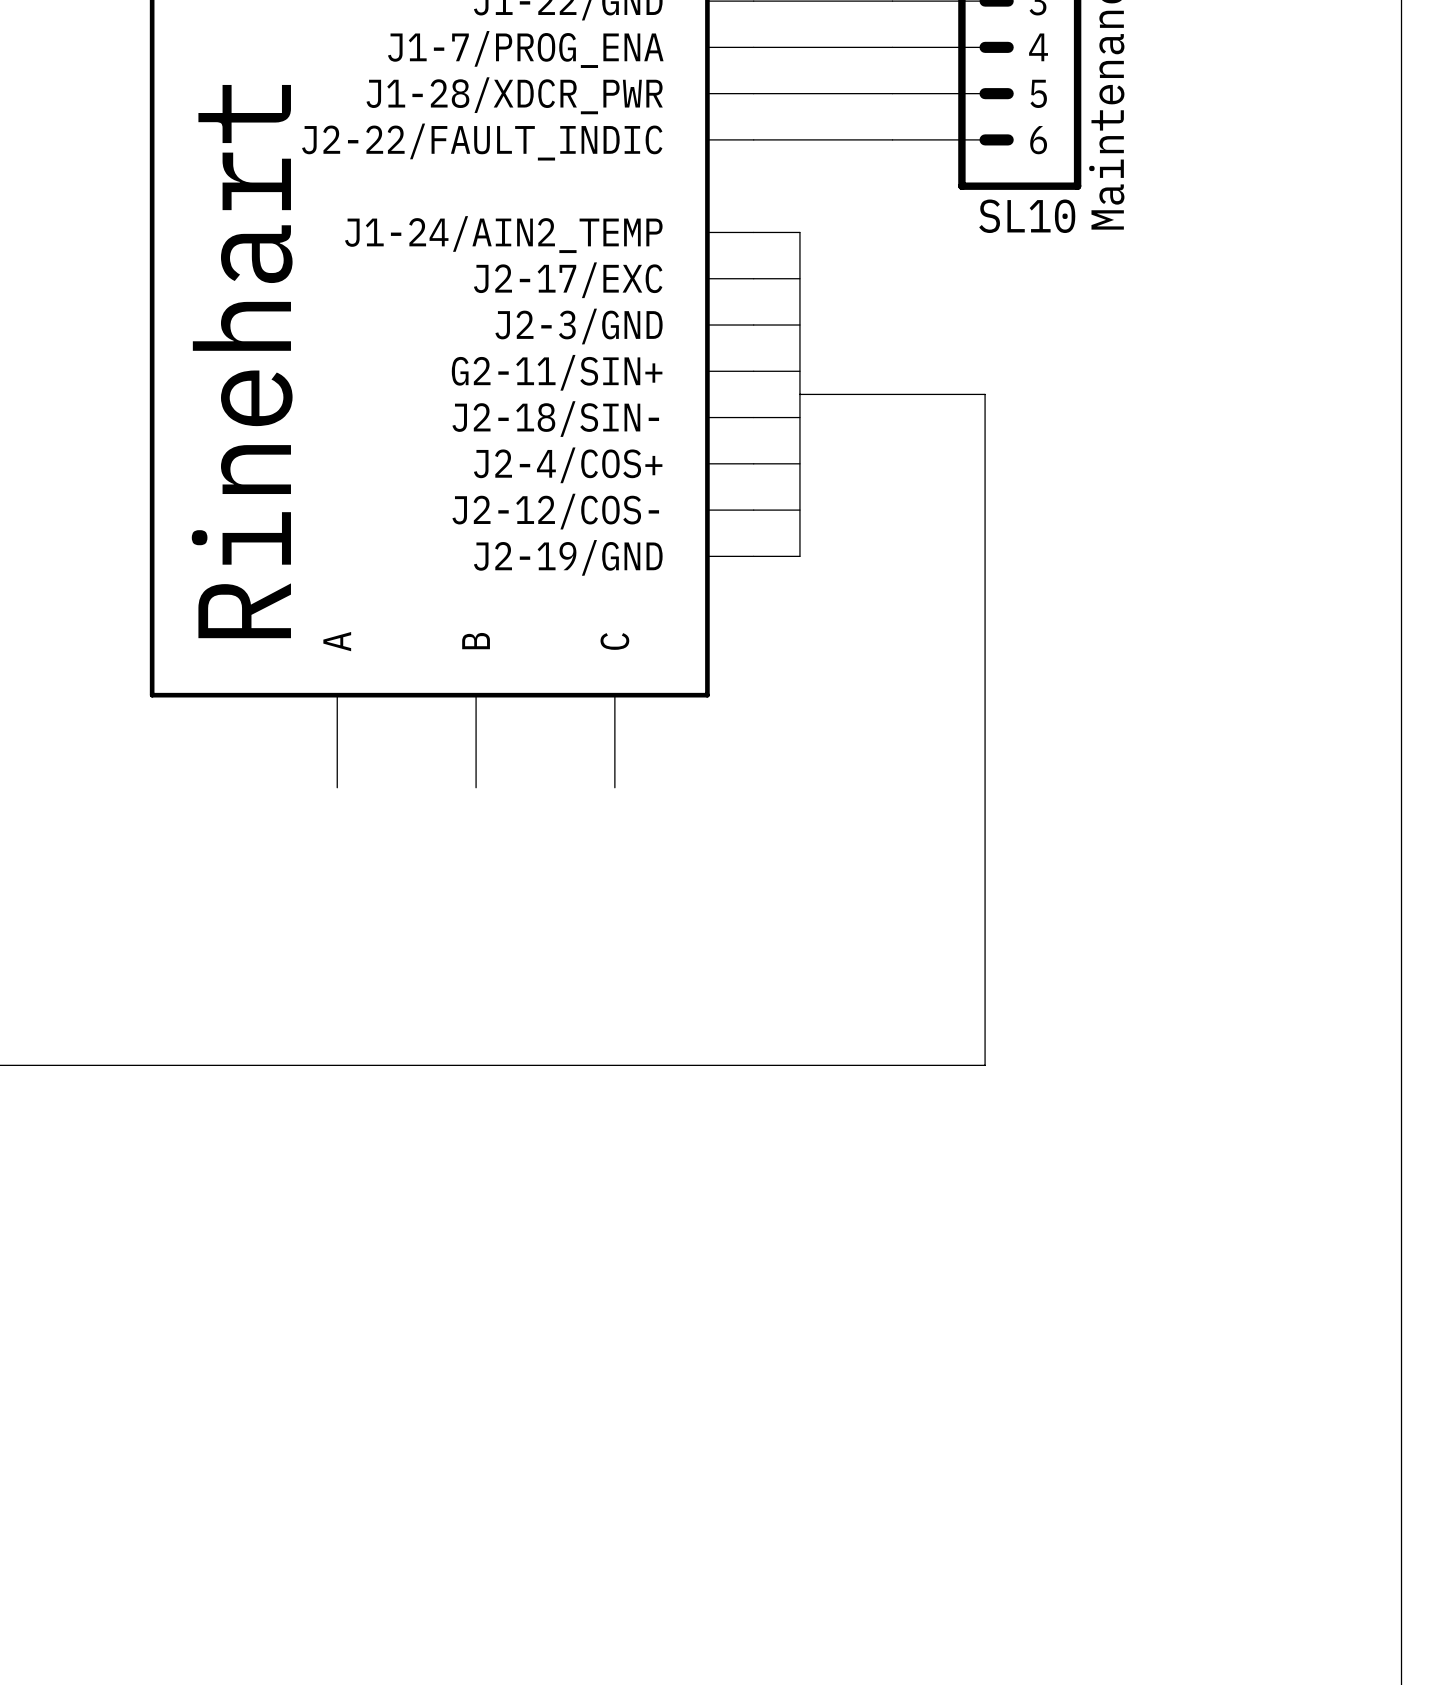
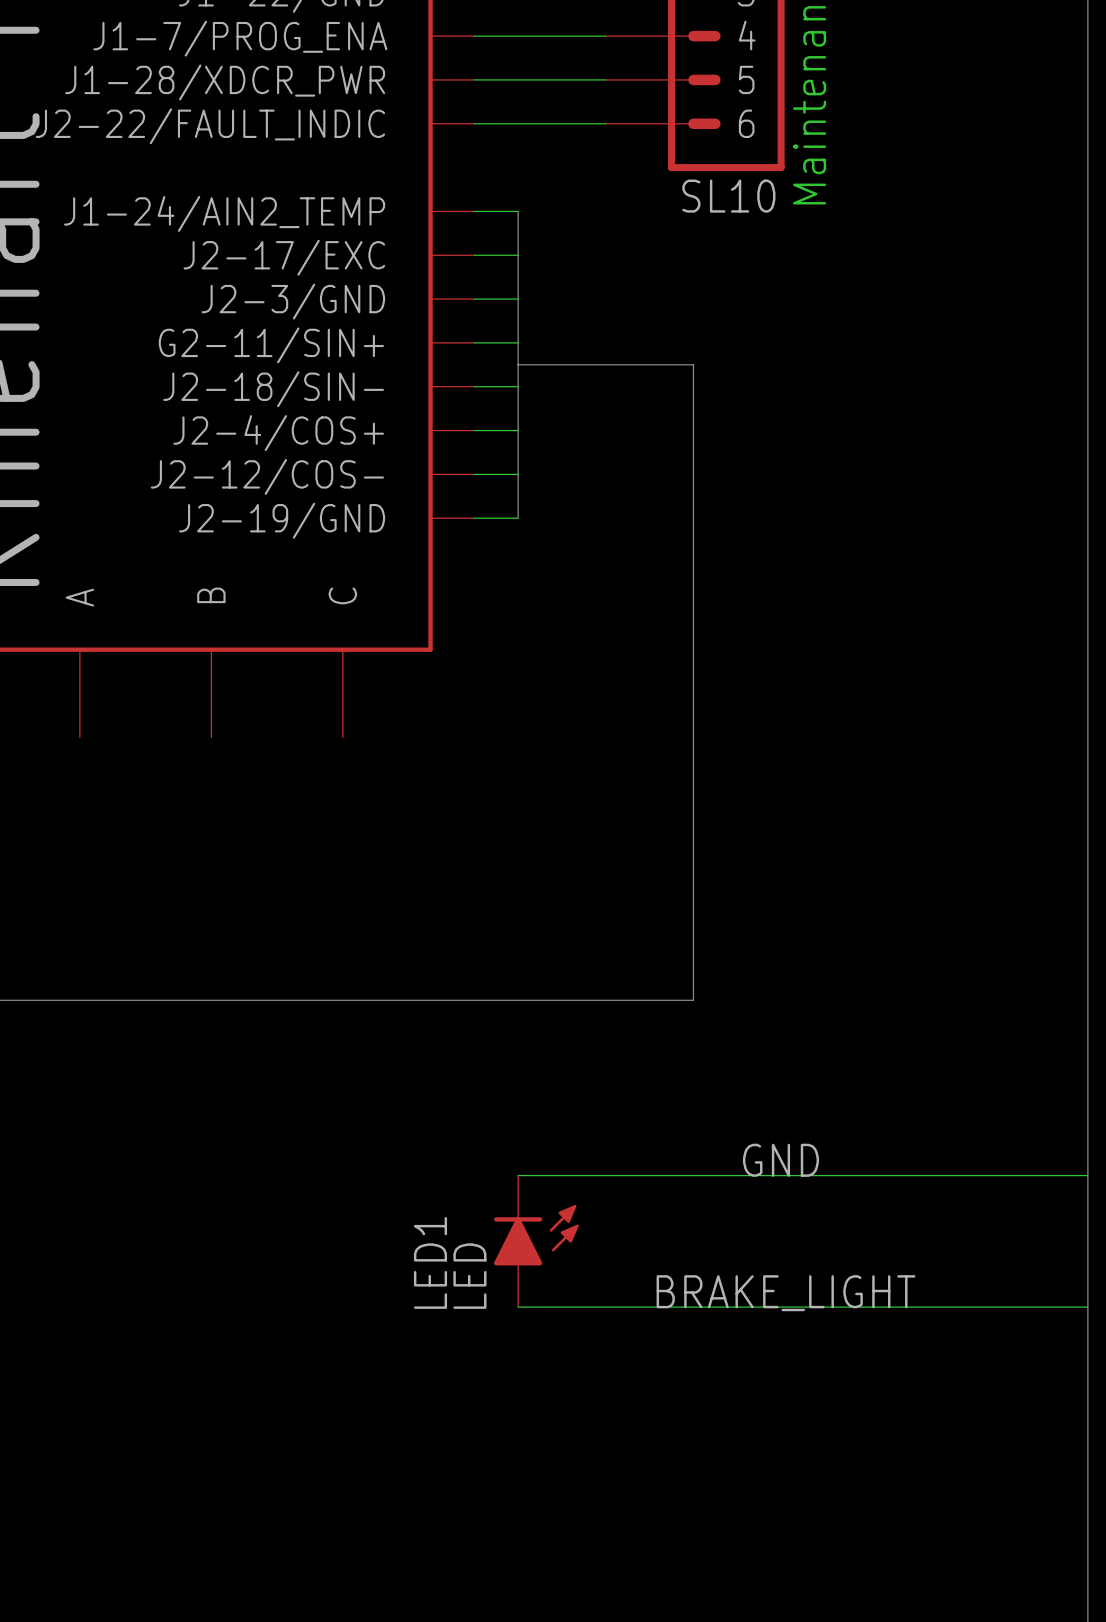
label: none -> GND (780, 1160)
wire: none -> (518, 1175) (1087, 1175)
LED1: none -> LED (536, 1241)
label: none -> BRAKE_LIGHT (786, 1293)
wire: none -> (518, 1307) (1087, 1307)

